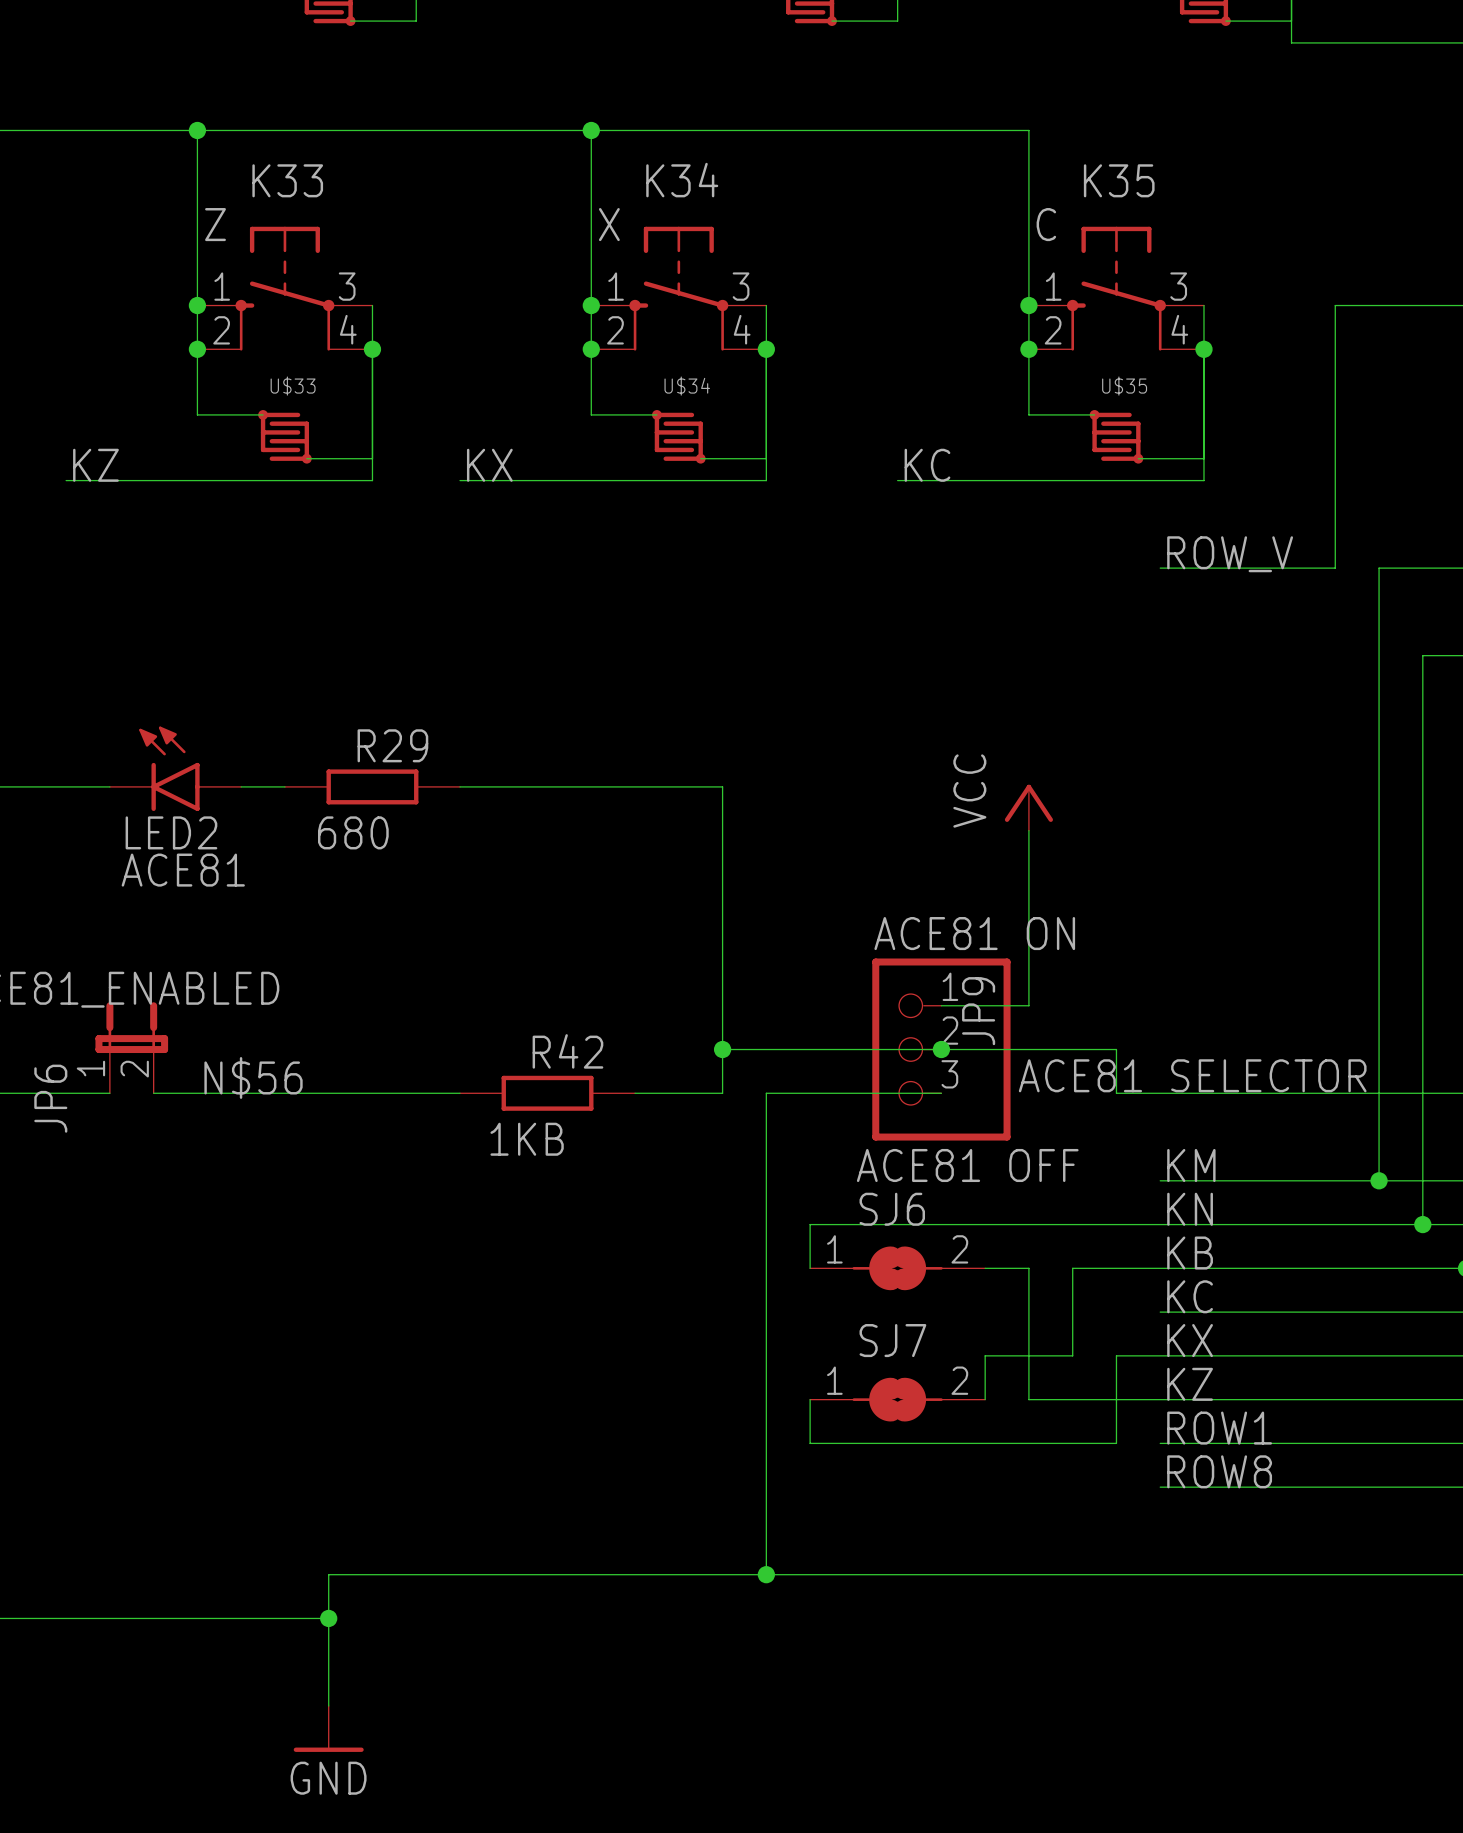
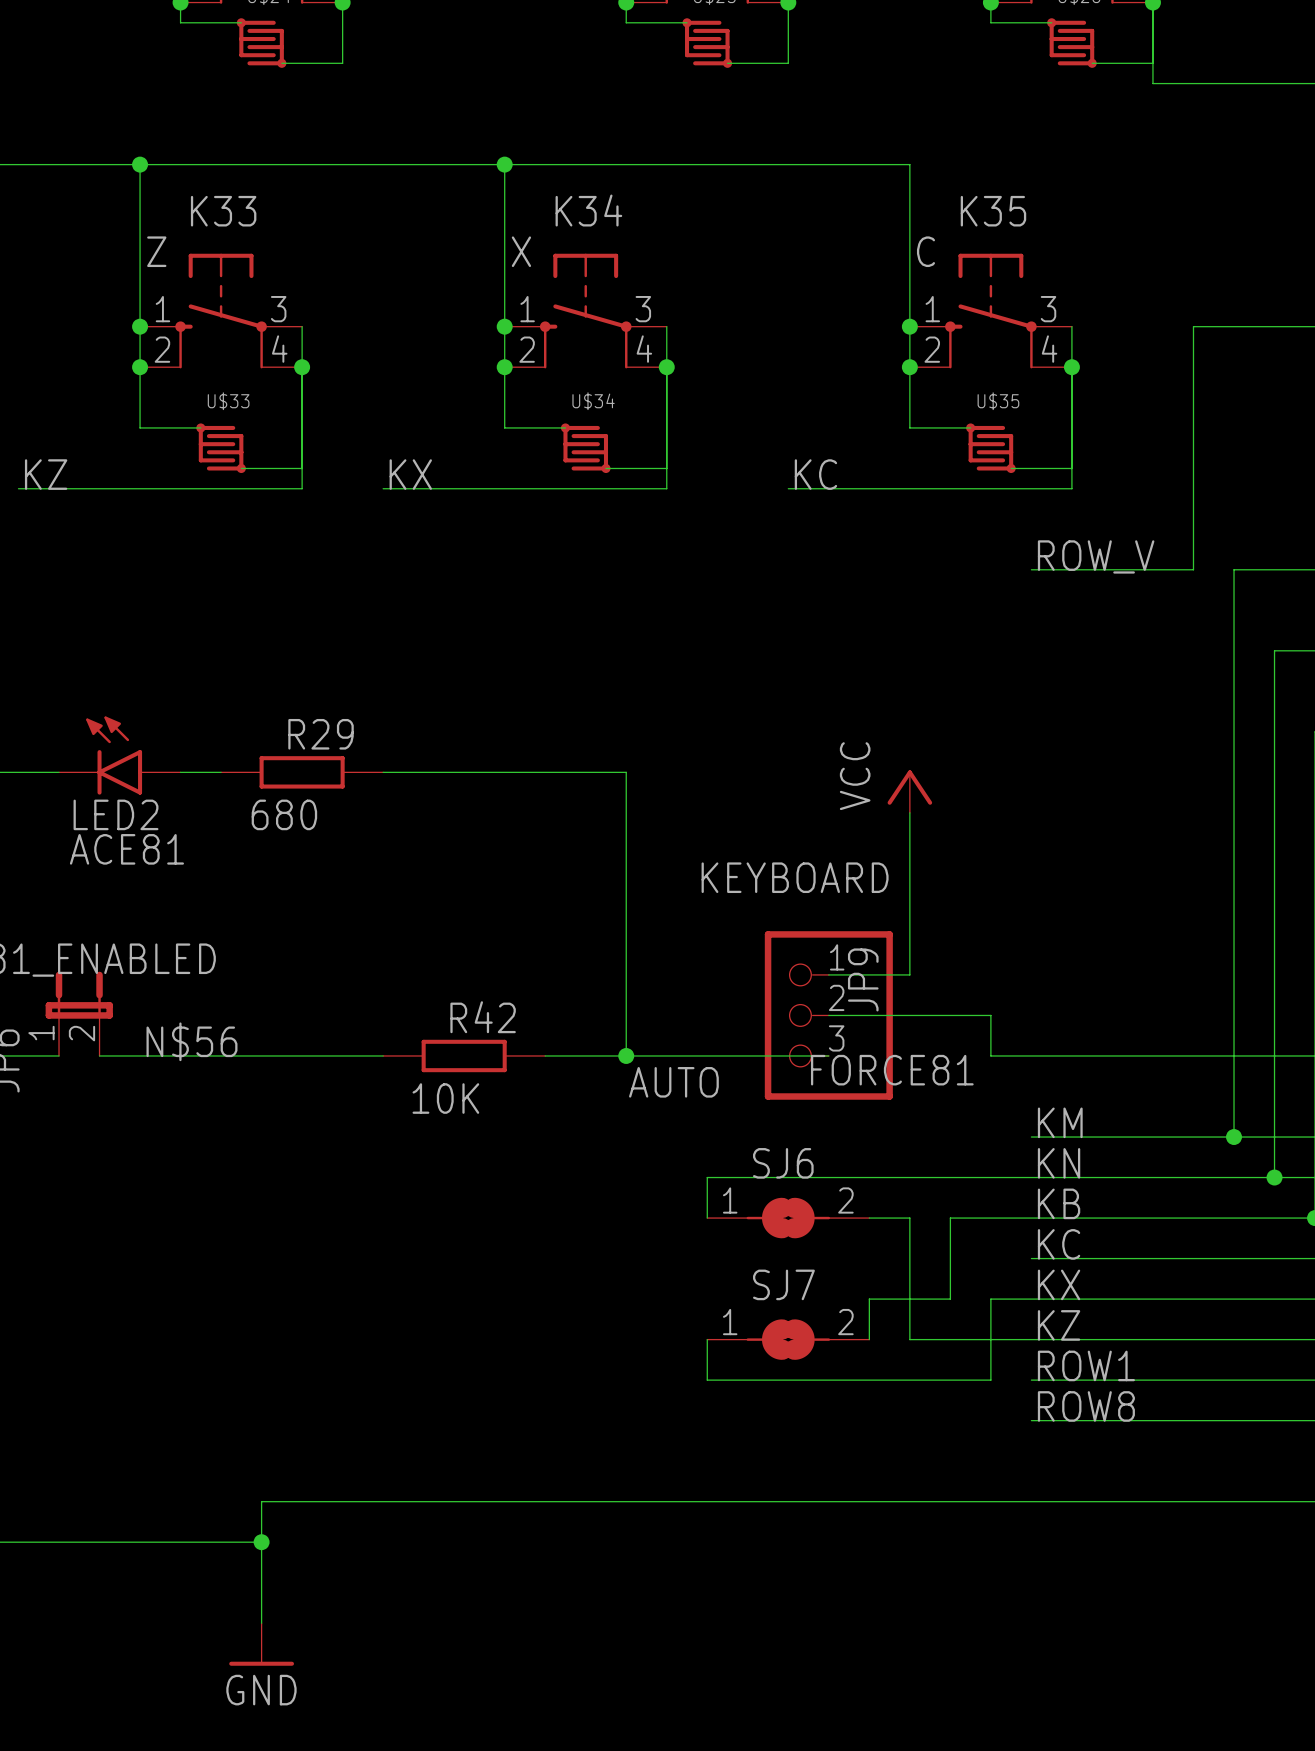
text: ACE81 ON (974, 933) -> none
wire: (722, 1049) (941, 1049) -> none
junction position: (722, 1049) -> (626, 1055)
junction: (941, 1049) -> none
JP9 value: ACE81 SELECTOR (1192, 1075) -> KEYBOARD (795, 877)
wire: (766, 1093) (766, 1574) -> (666, 1055) (626, 1055)
text: none -> FORCE81 (892, 1070)
text: none -> AUTO (673, 1082)
R42 value: 1KB (527, 1139) -> 10K (445, 1098)
text: ACE81 OFF (967, 1165) -> none
junction: (766, 1574) -> none

